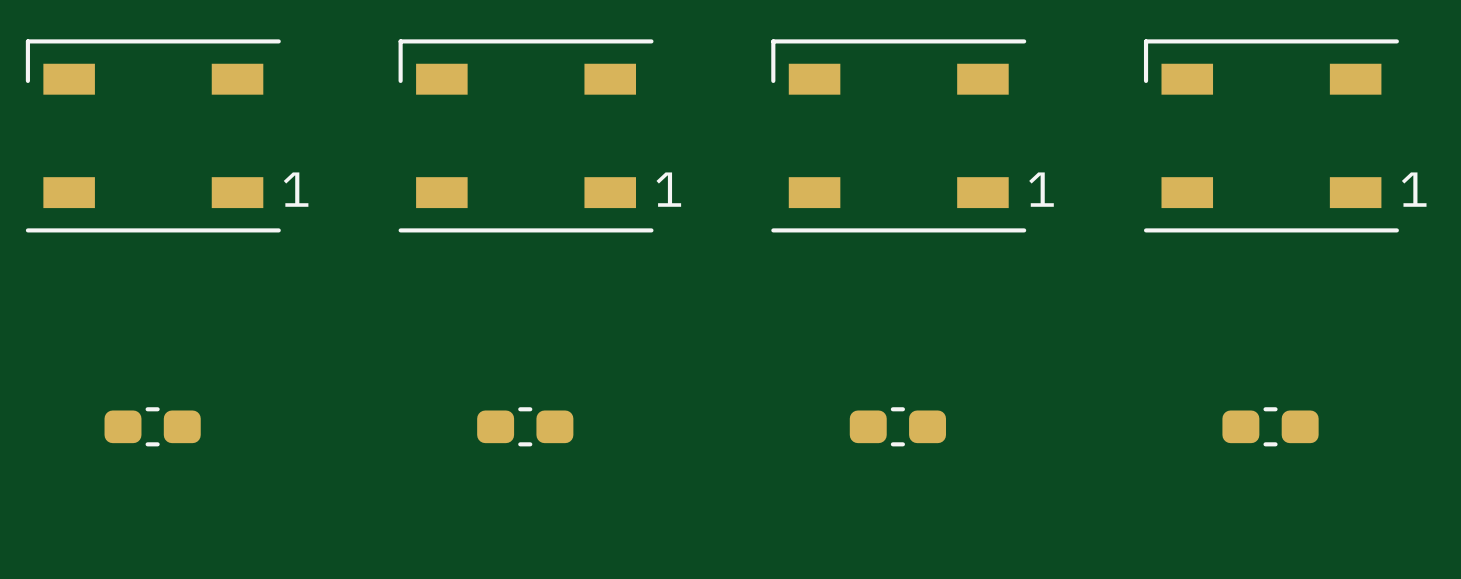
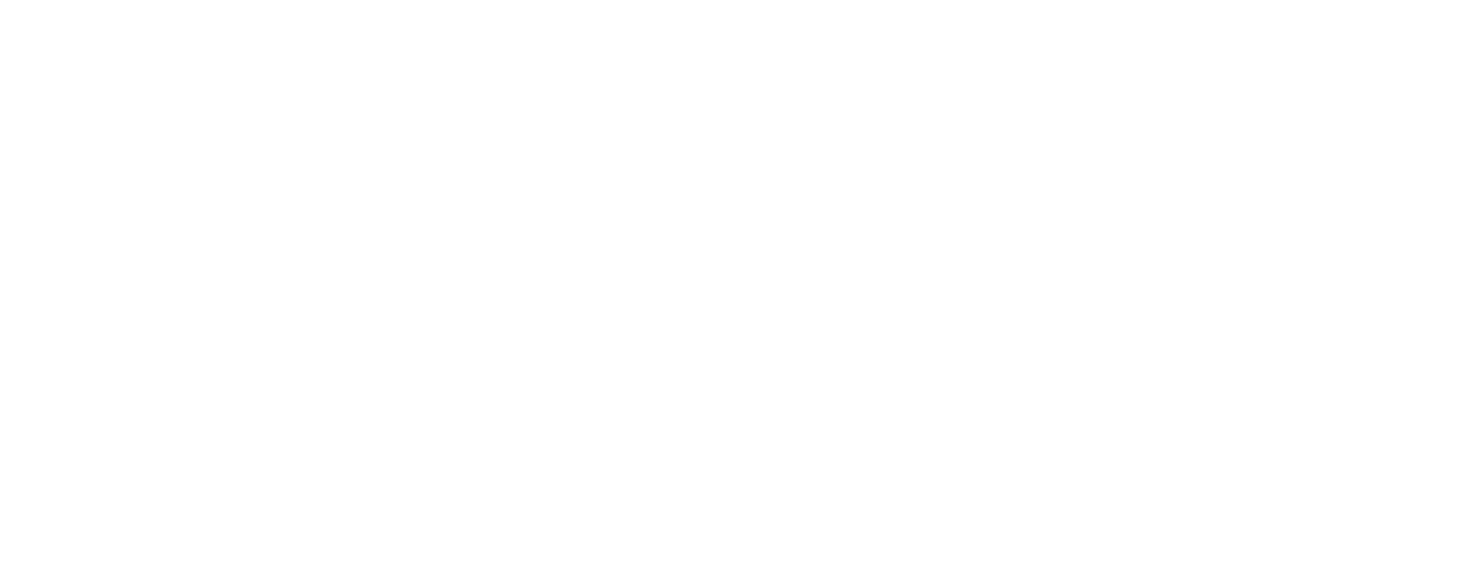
part: (153, 135) -> none
part: (526, 135) -> none
part: (898, 135) -> none
part: (1271, 135) -> none
part: (152, 426) -> none
part: (525, 426) -> none
part: (897, 426) -> none
part: (1270, 426) -> none

